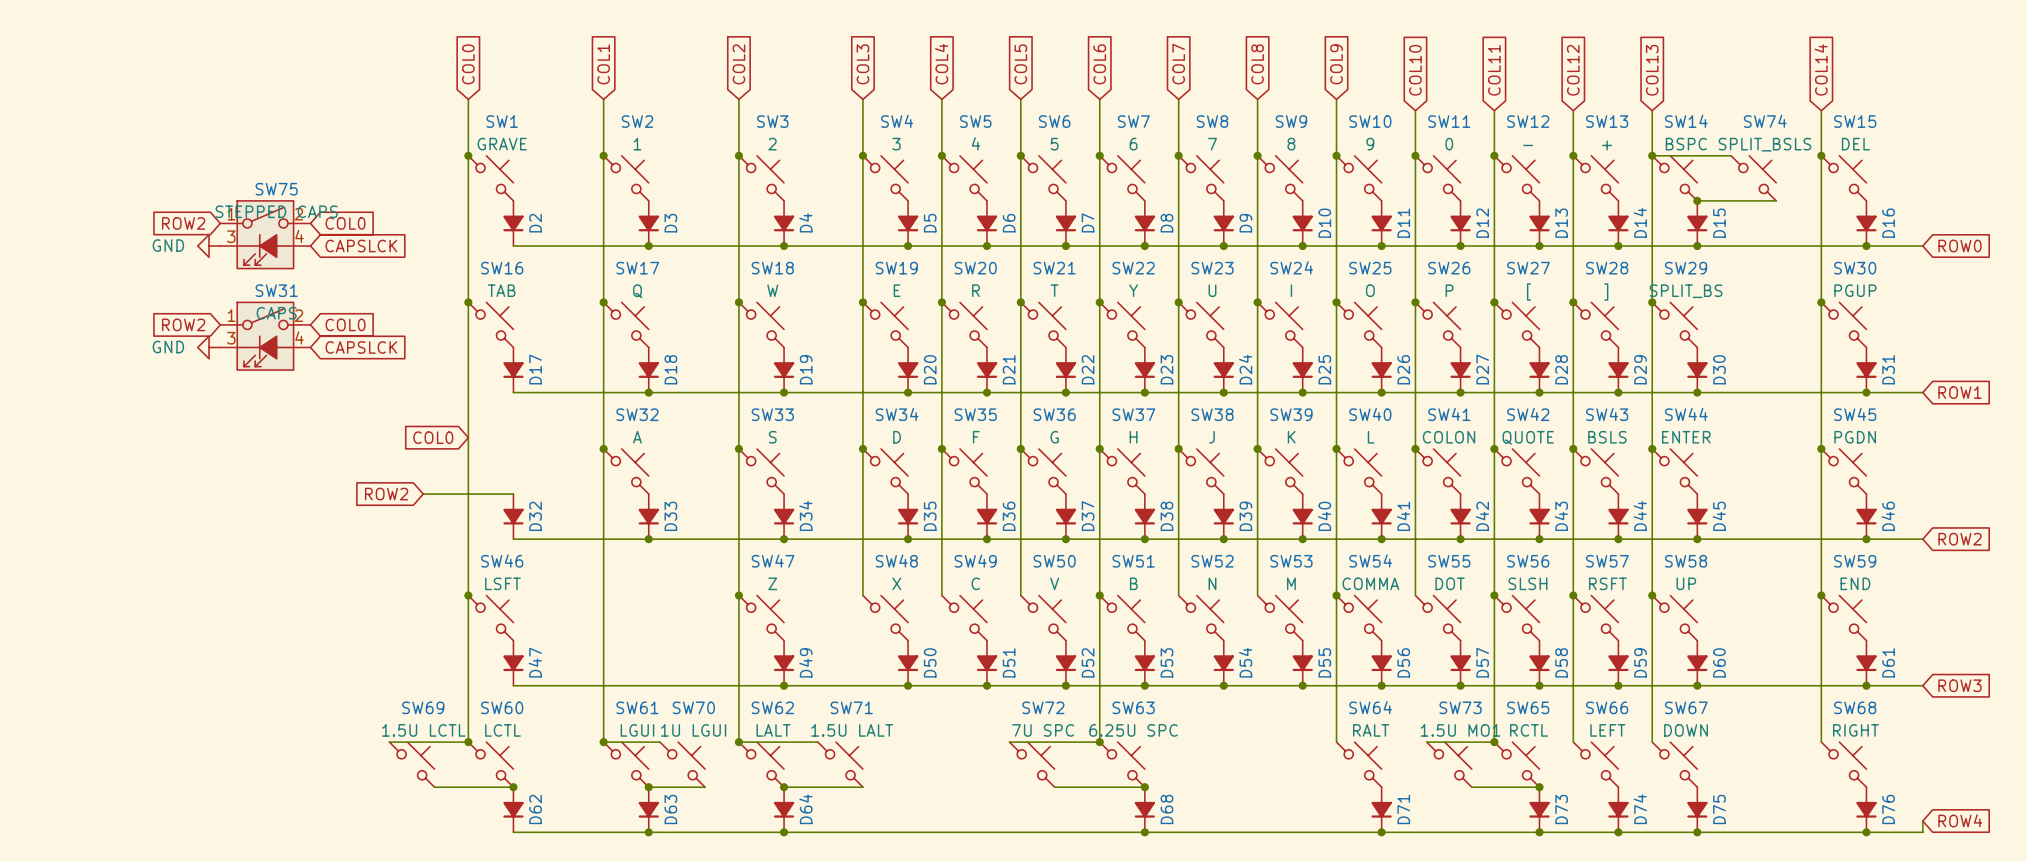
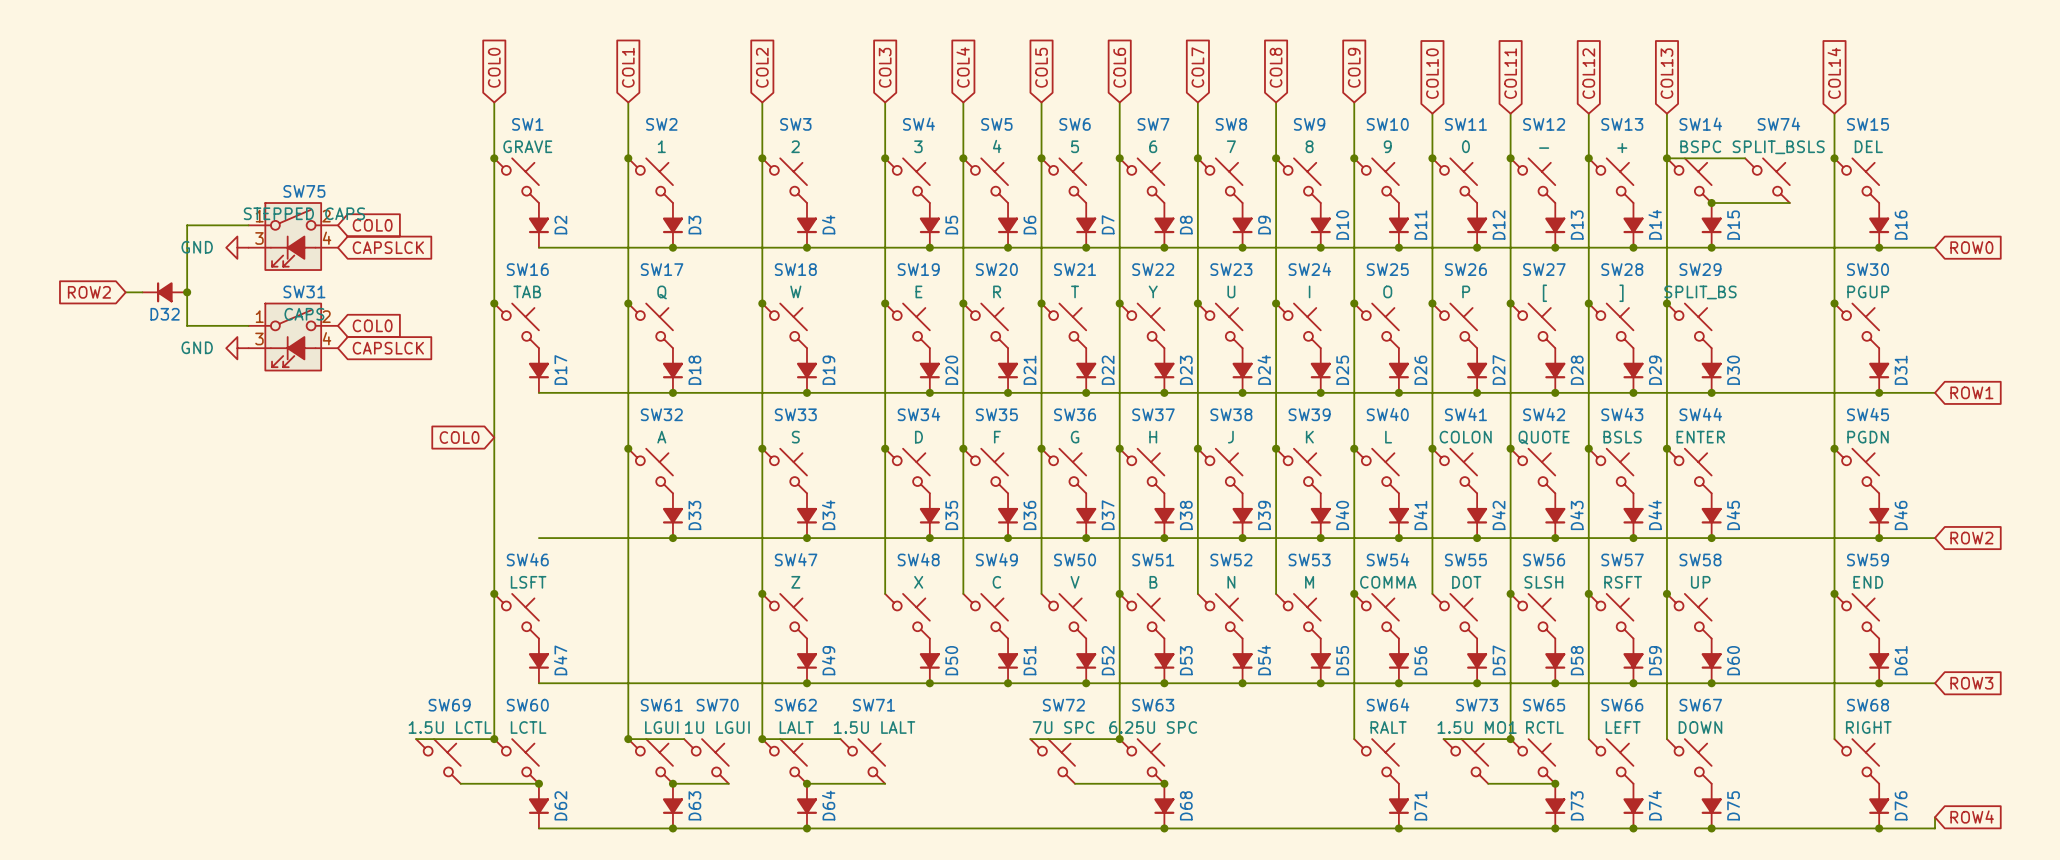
global label: ROW2 (183, 223) -> none
wire: none -> (248, 225) (187, 225) (187, 325) (248, 325)
global label: none -> ROW2 (89, 292)
wire: none -> (125, 292) (142, 292)
junction: none -> (187, 292)
global label: ROW2 (183, 324) -> none
global label: ROW2 (386, 494) -> none
wire: (423, 494) (513, 494) -> none
D32 rotation: 0° (513, 516) -> 90° clockwise (164, 292)
D32 position: (513, 516) -> (164, 292)

